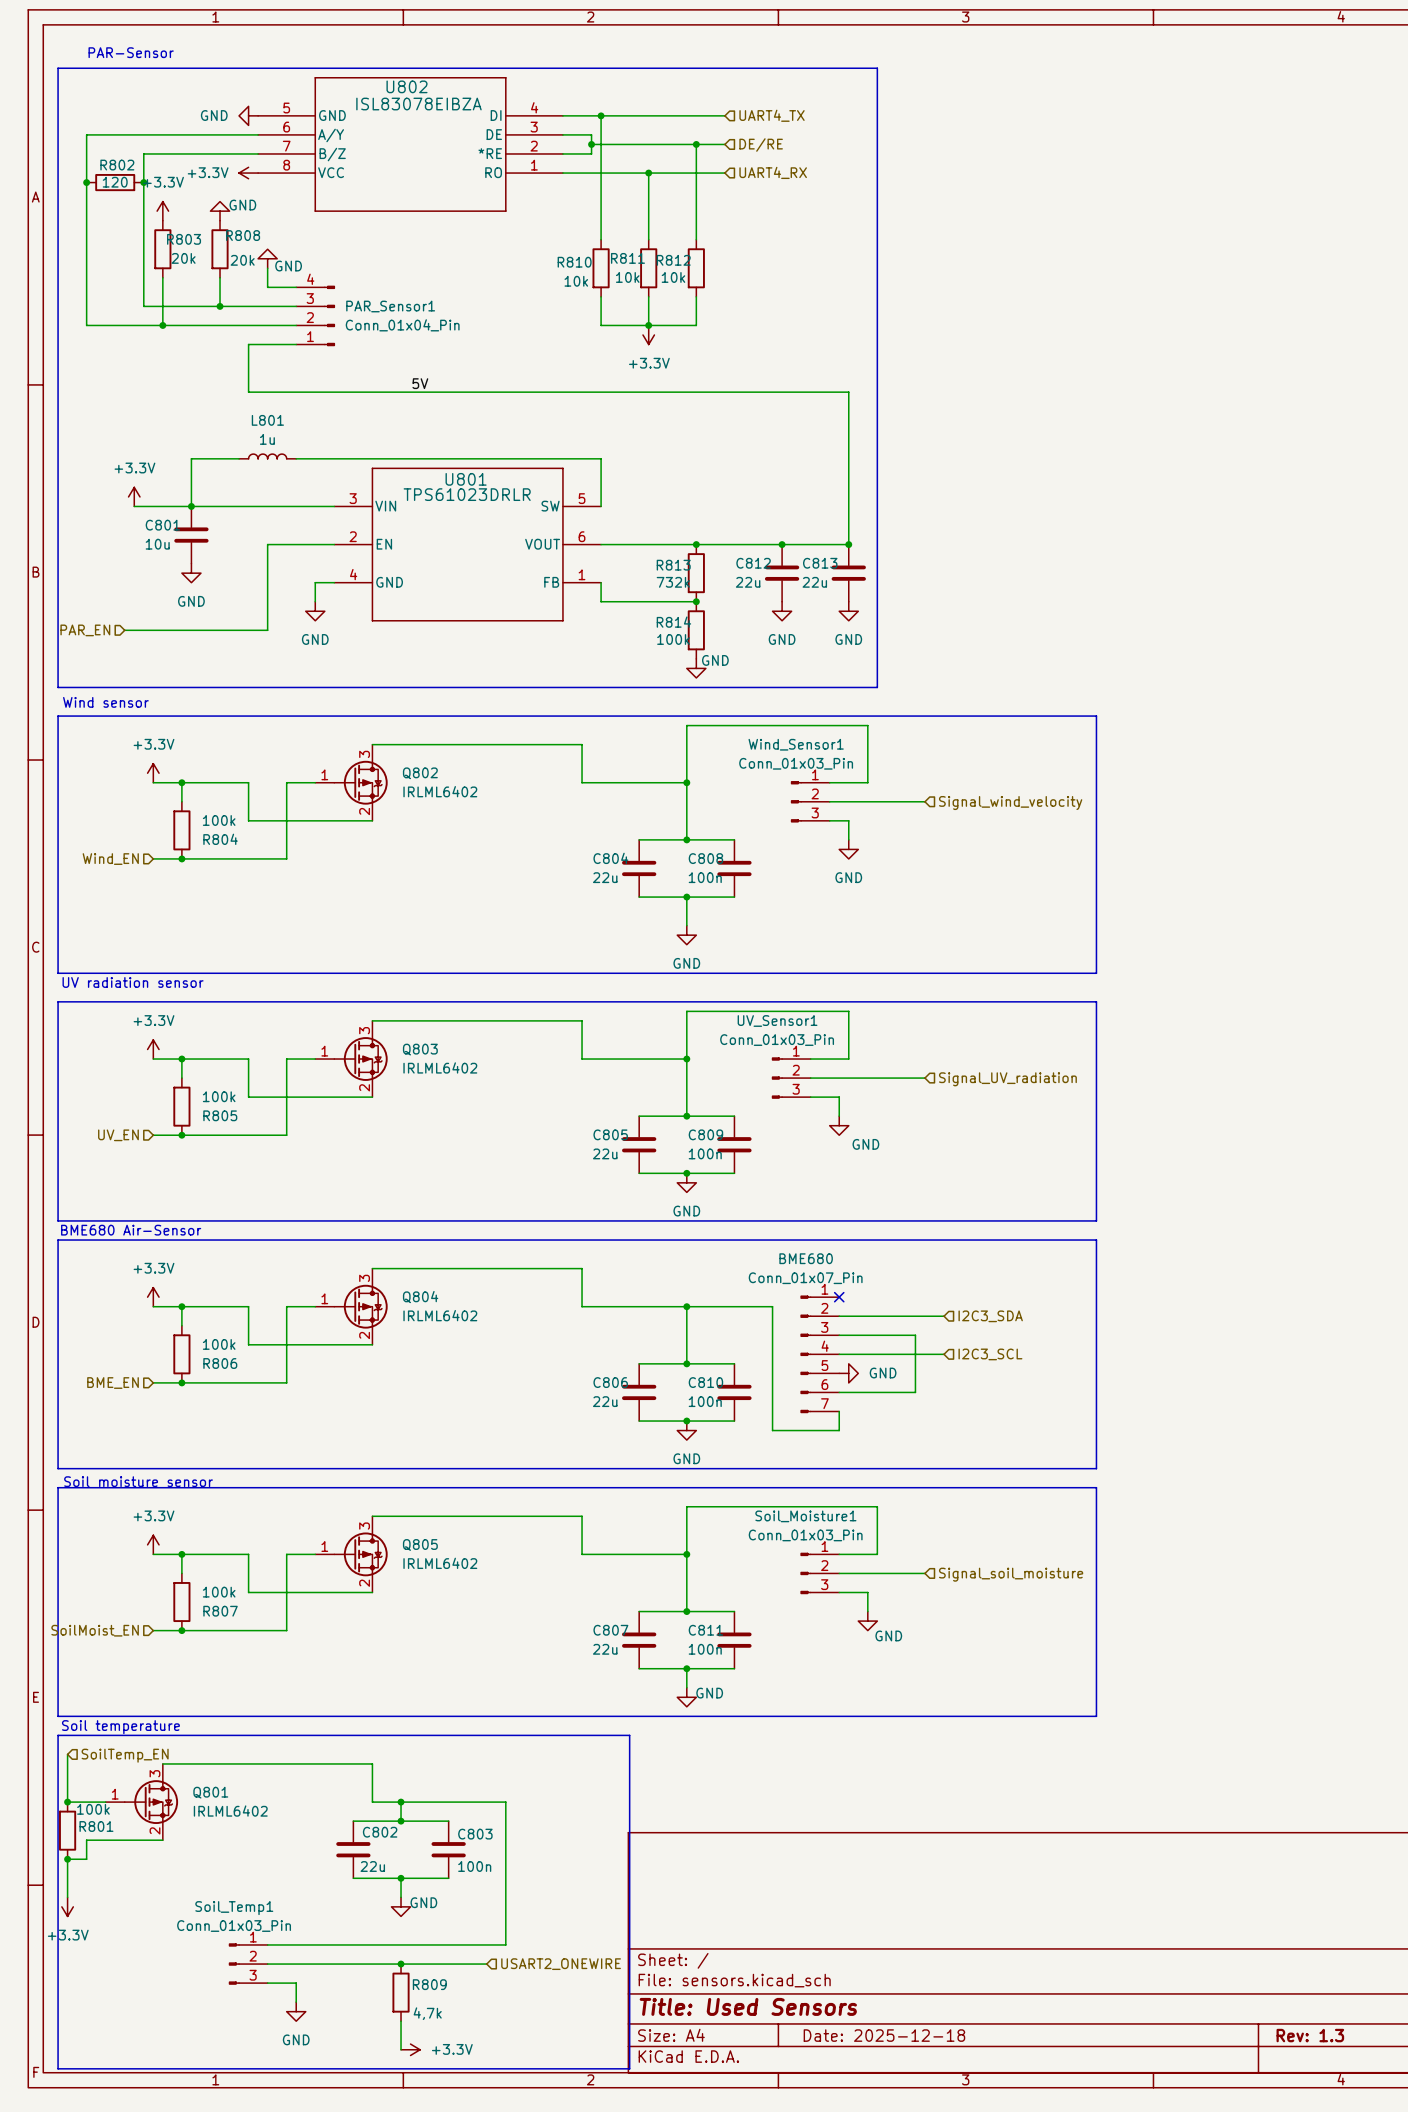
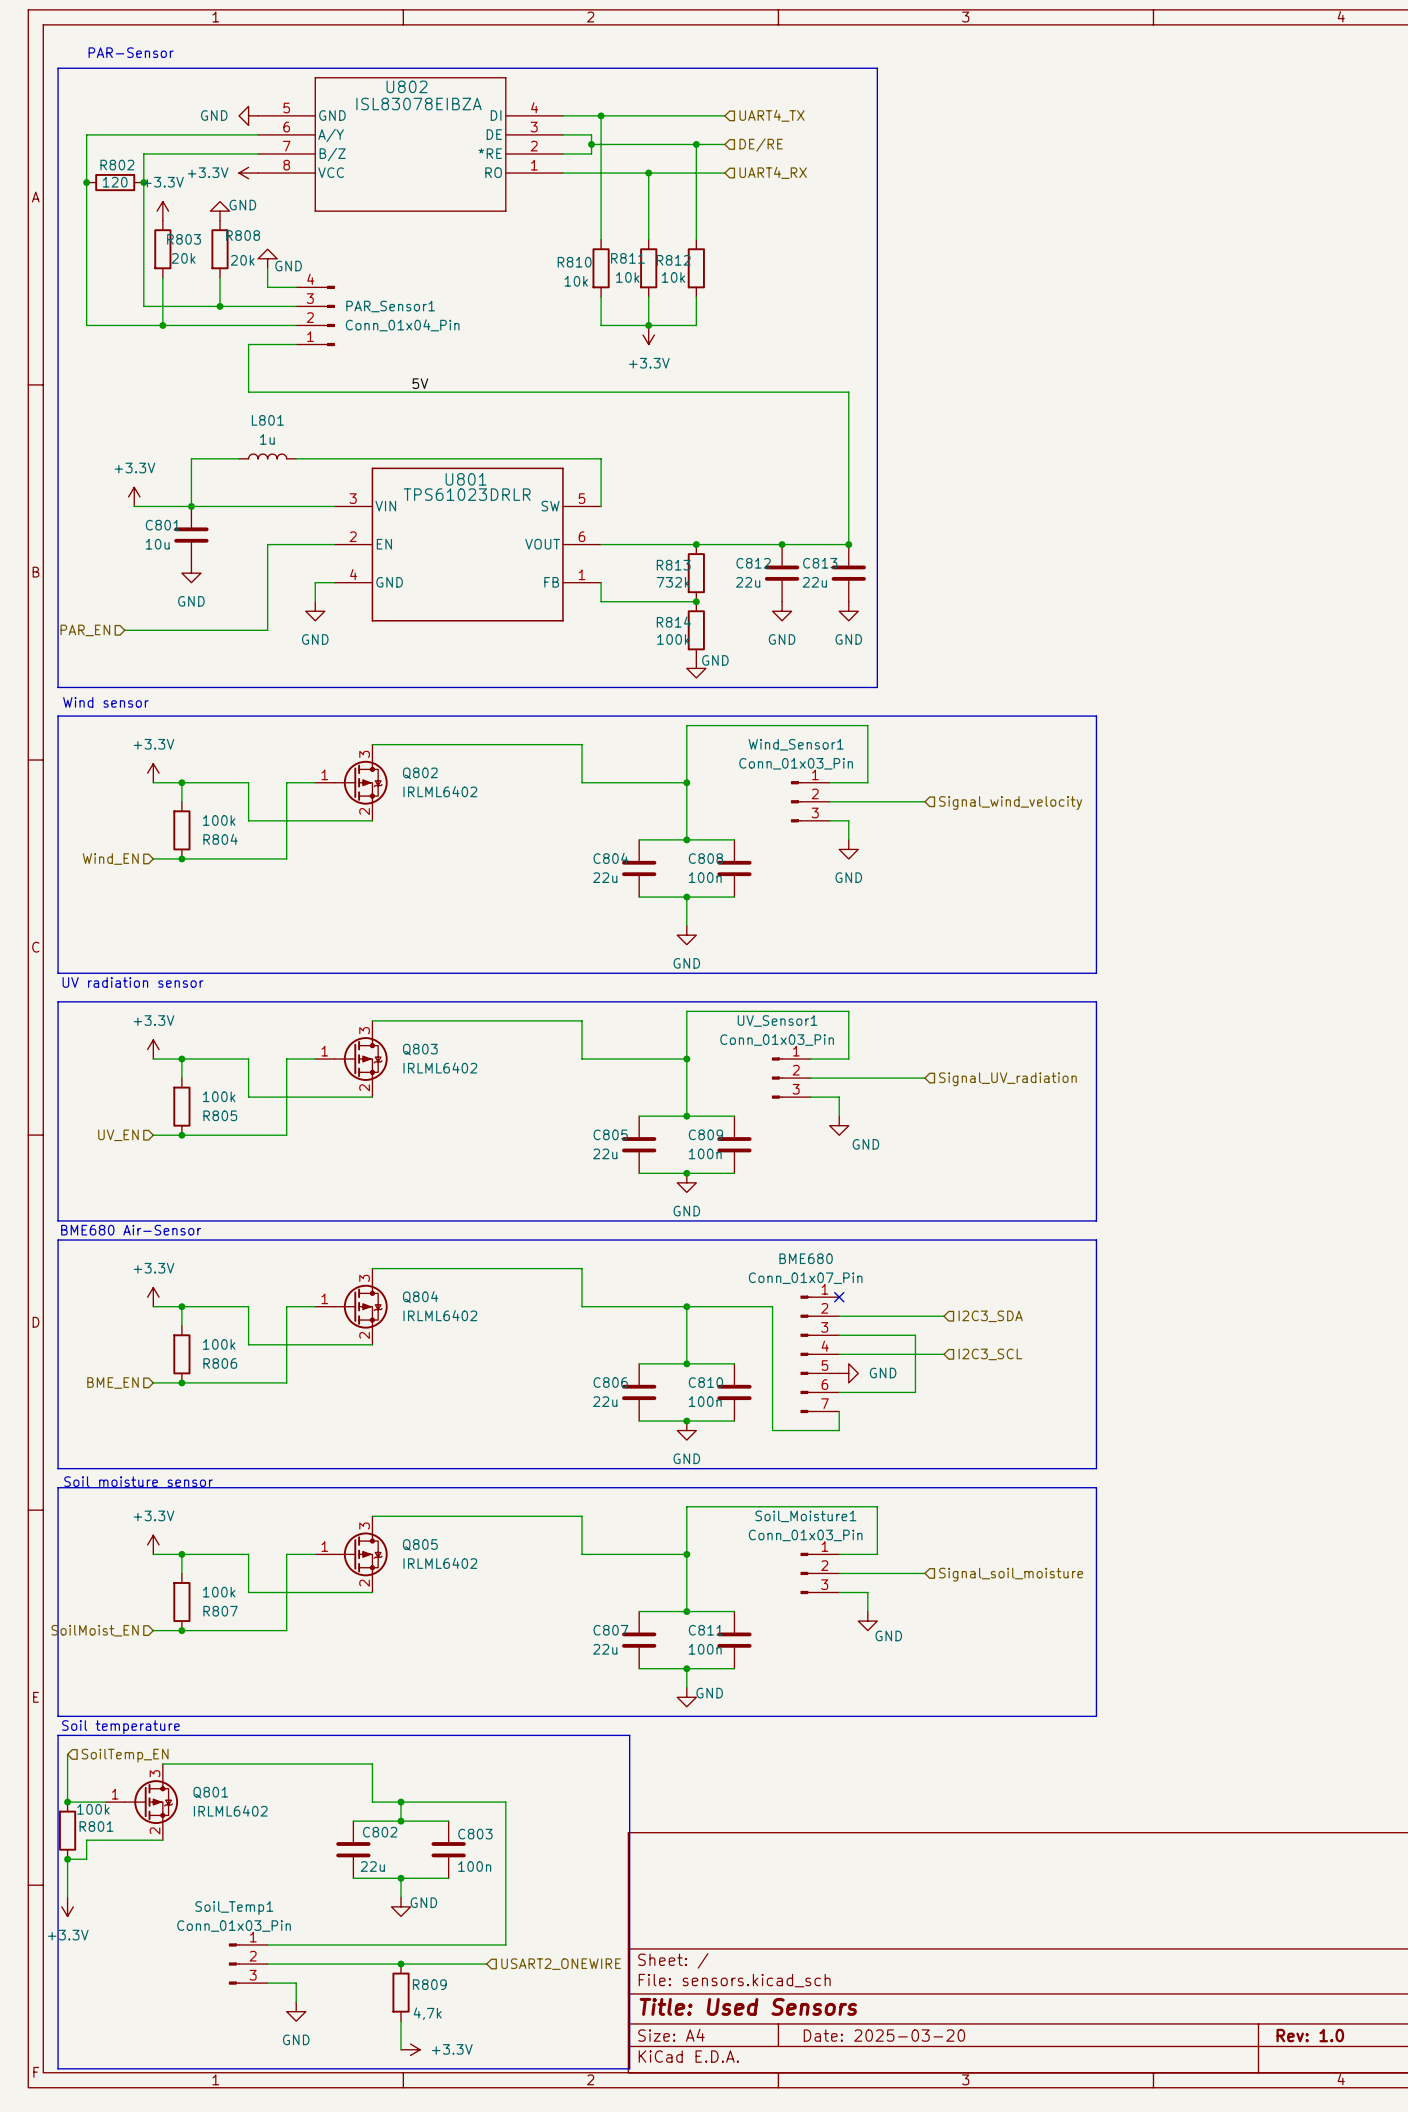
title block: Date: 2025-12-18 (884, 2035) -> Date: 2025-03-20 (884, 2035)
title block: Rev: 1.3 (1310, 2035) -> Rev: 1.0 (1310, 2035)

